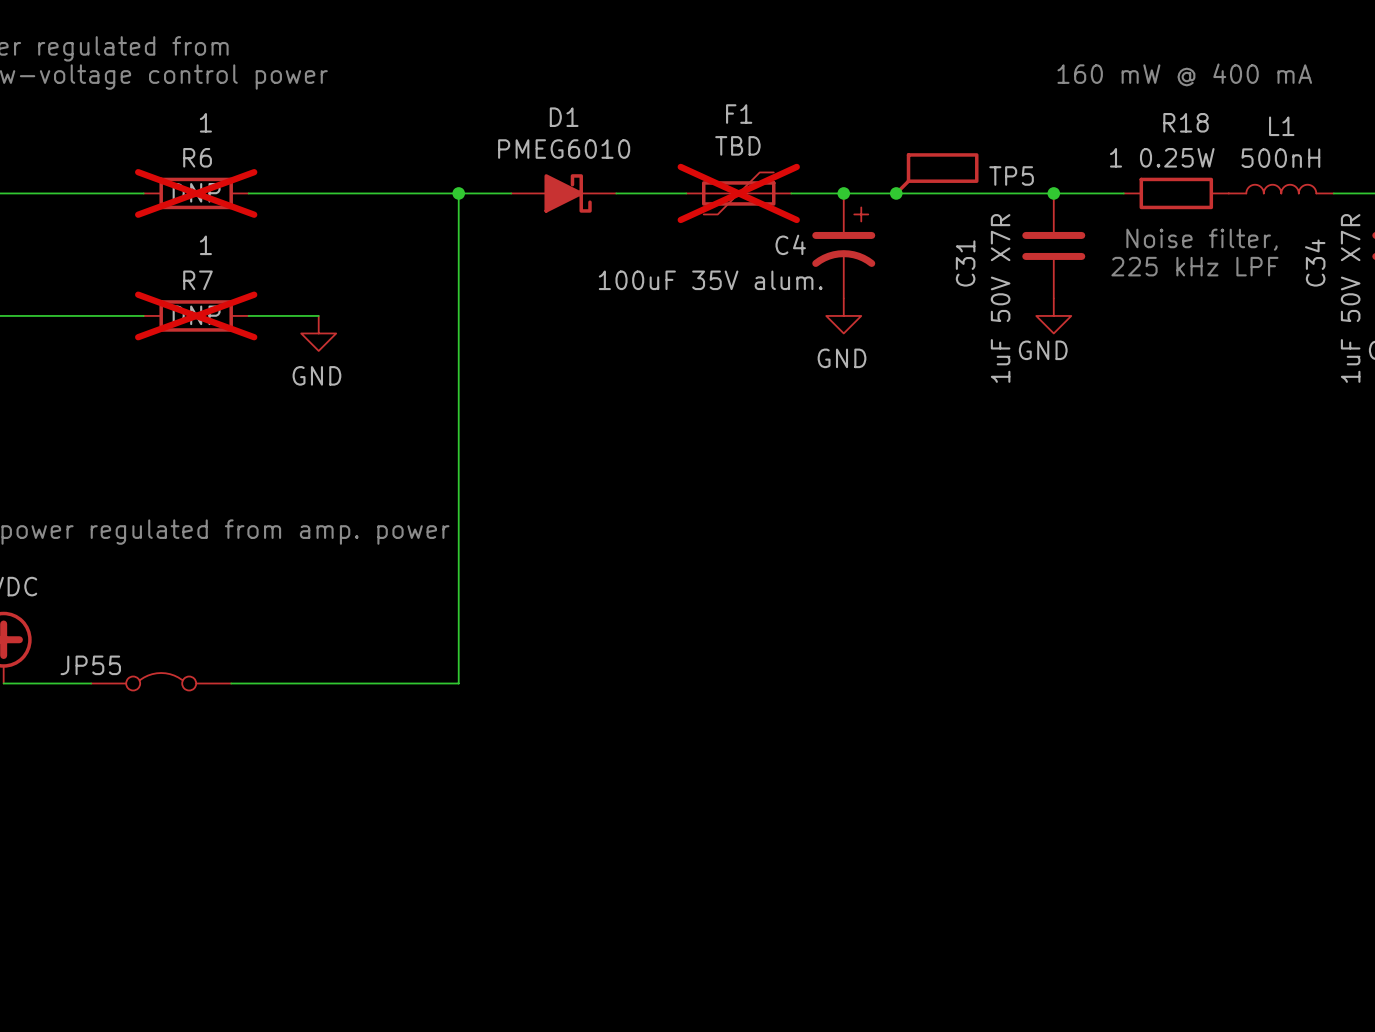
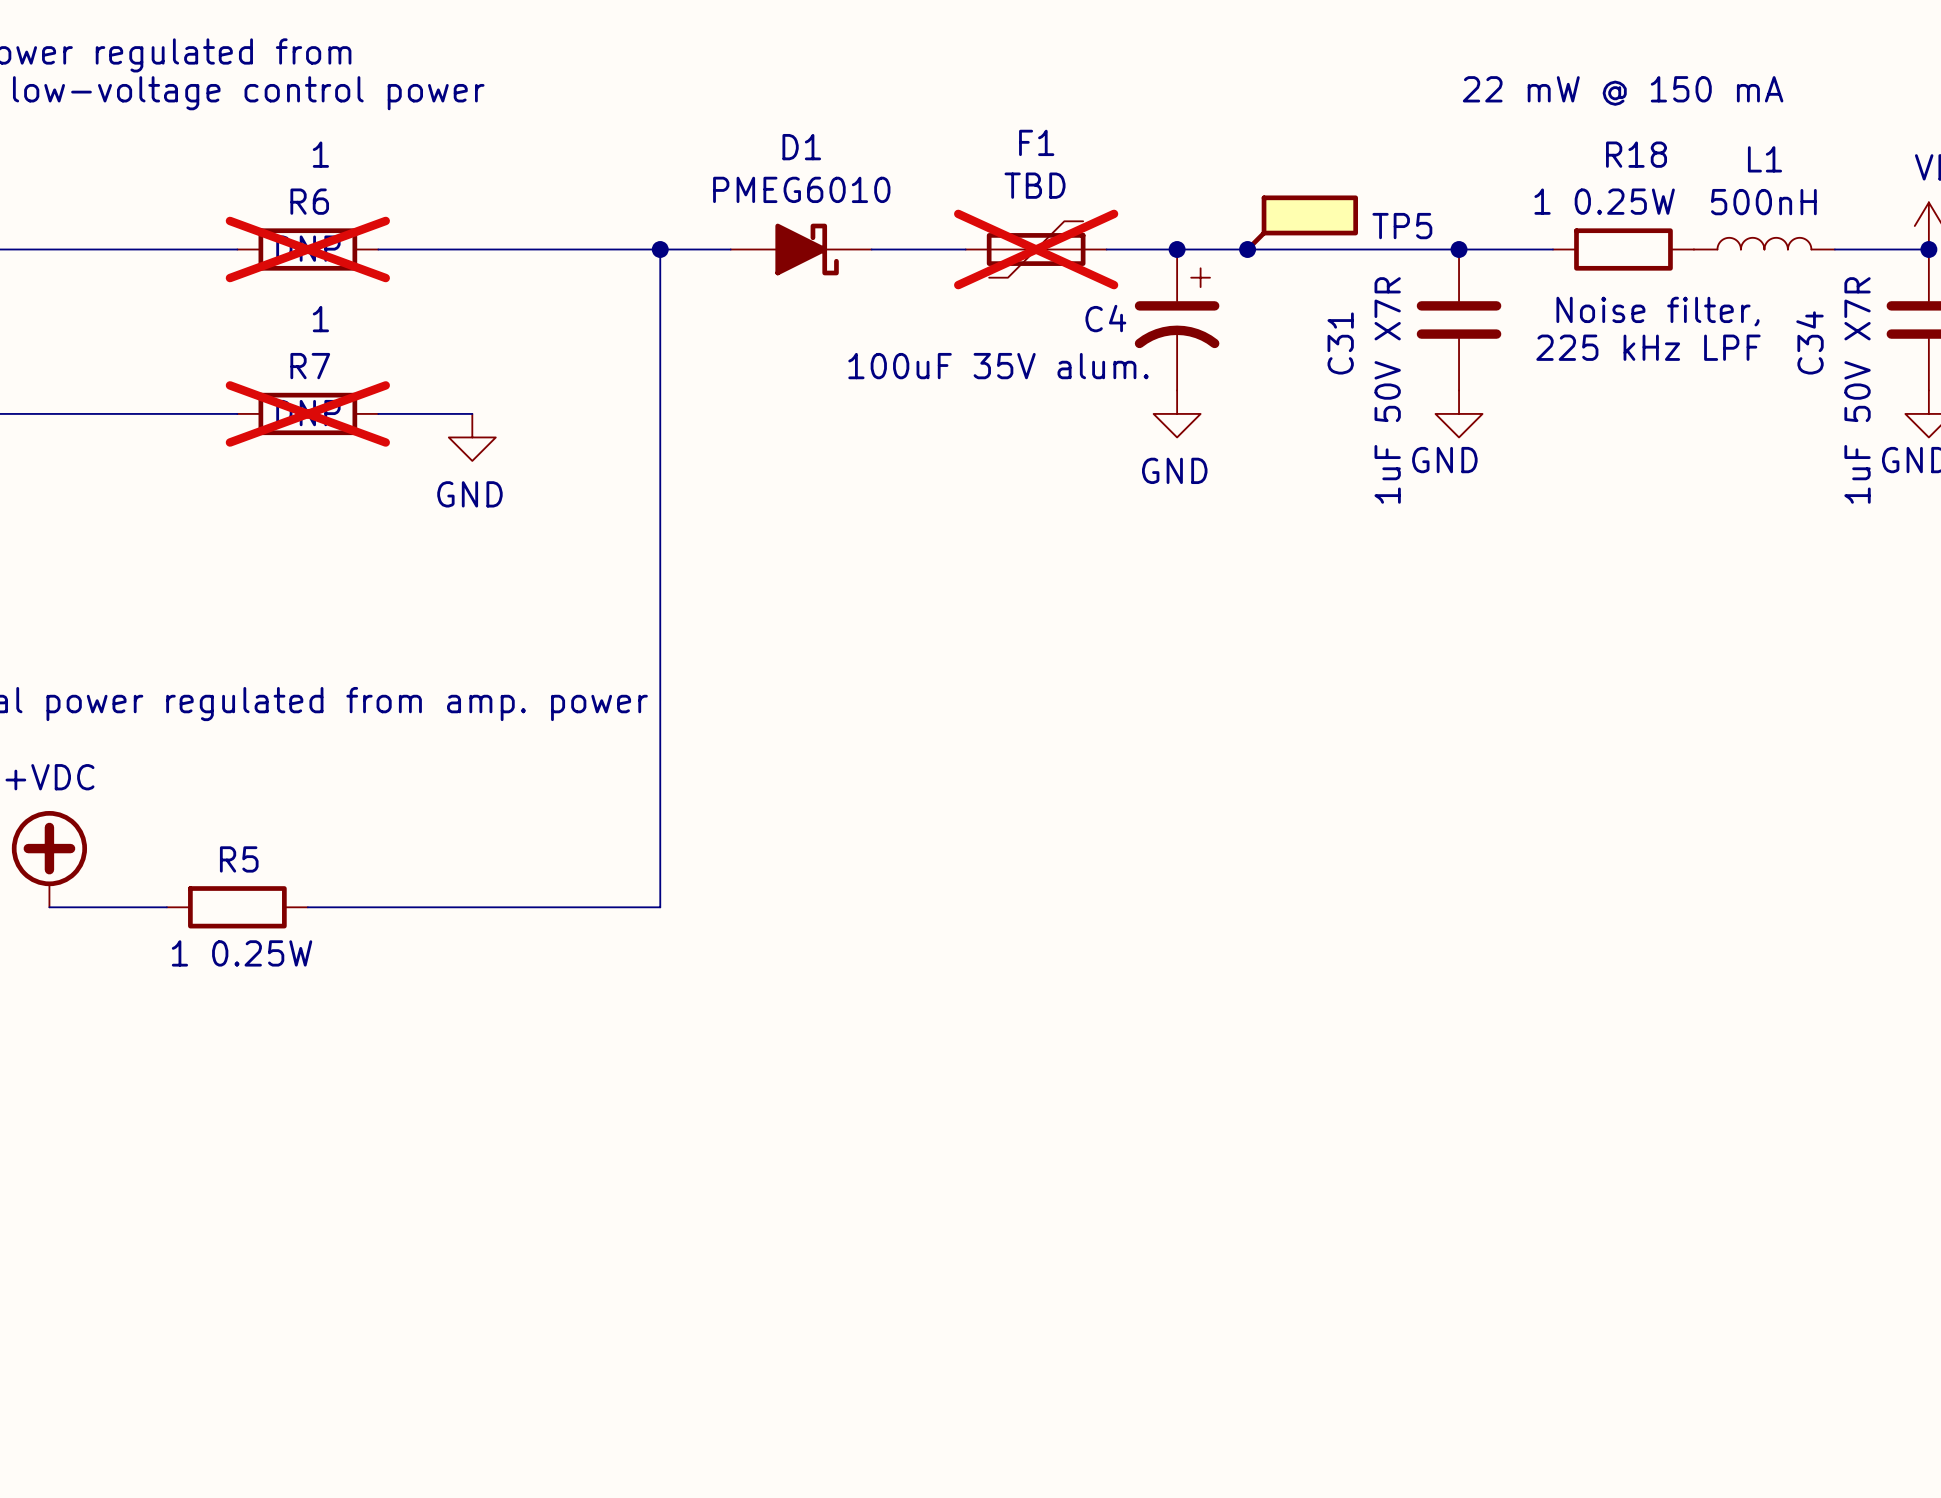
text: 160 mW @ 400 mA (1184, 74) -> 22 mW @ 150 mA (1623, 90)
JP55: (161, 681) -> none
R5: none -> 1 0.25W (237, 907)

